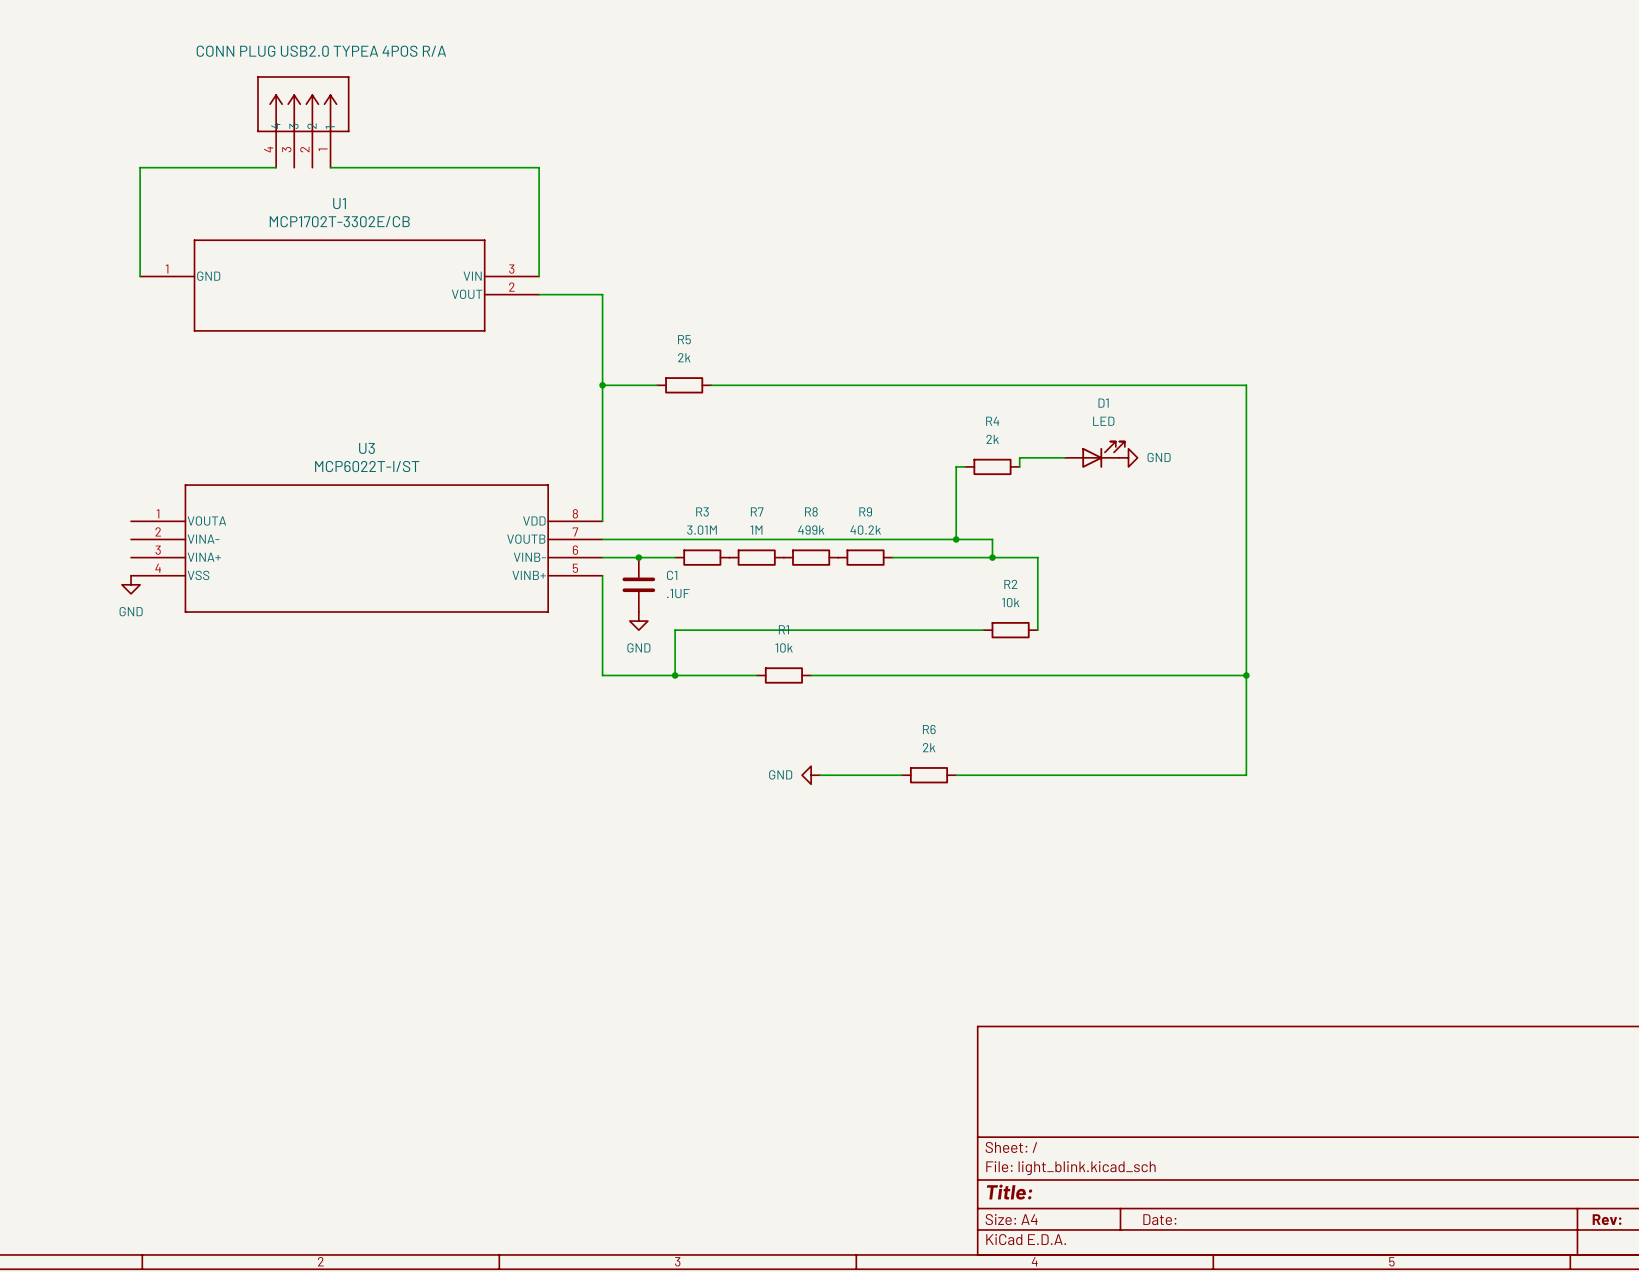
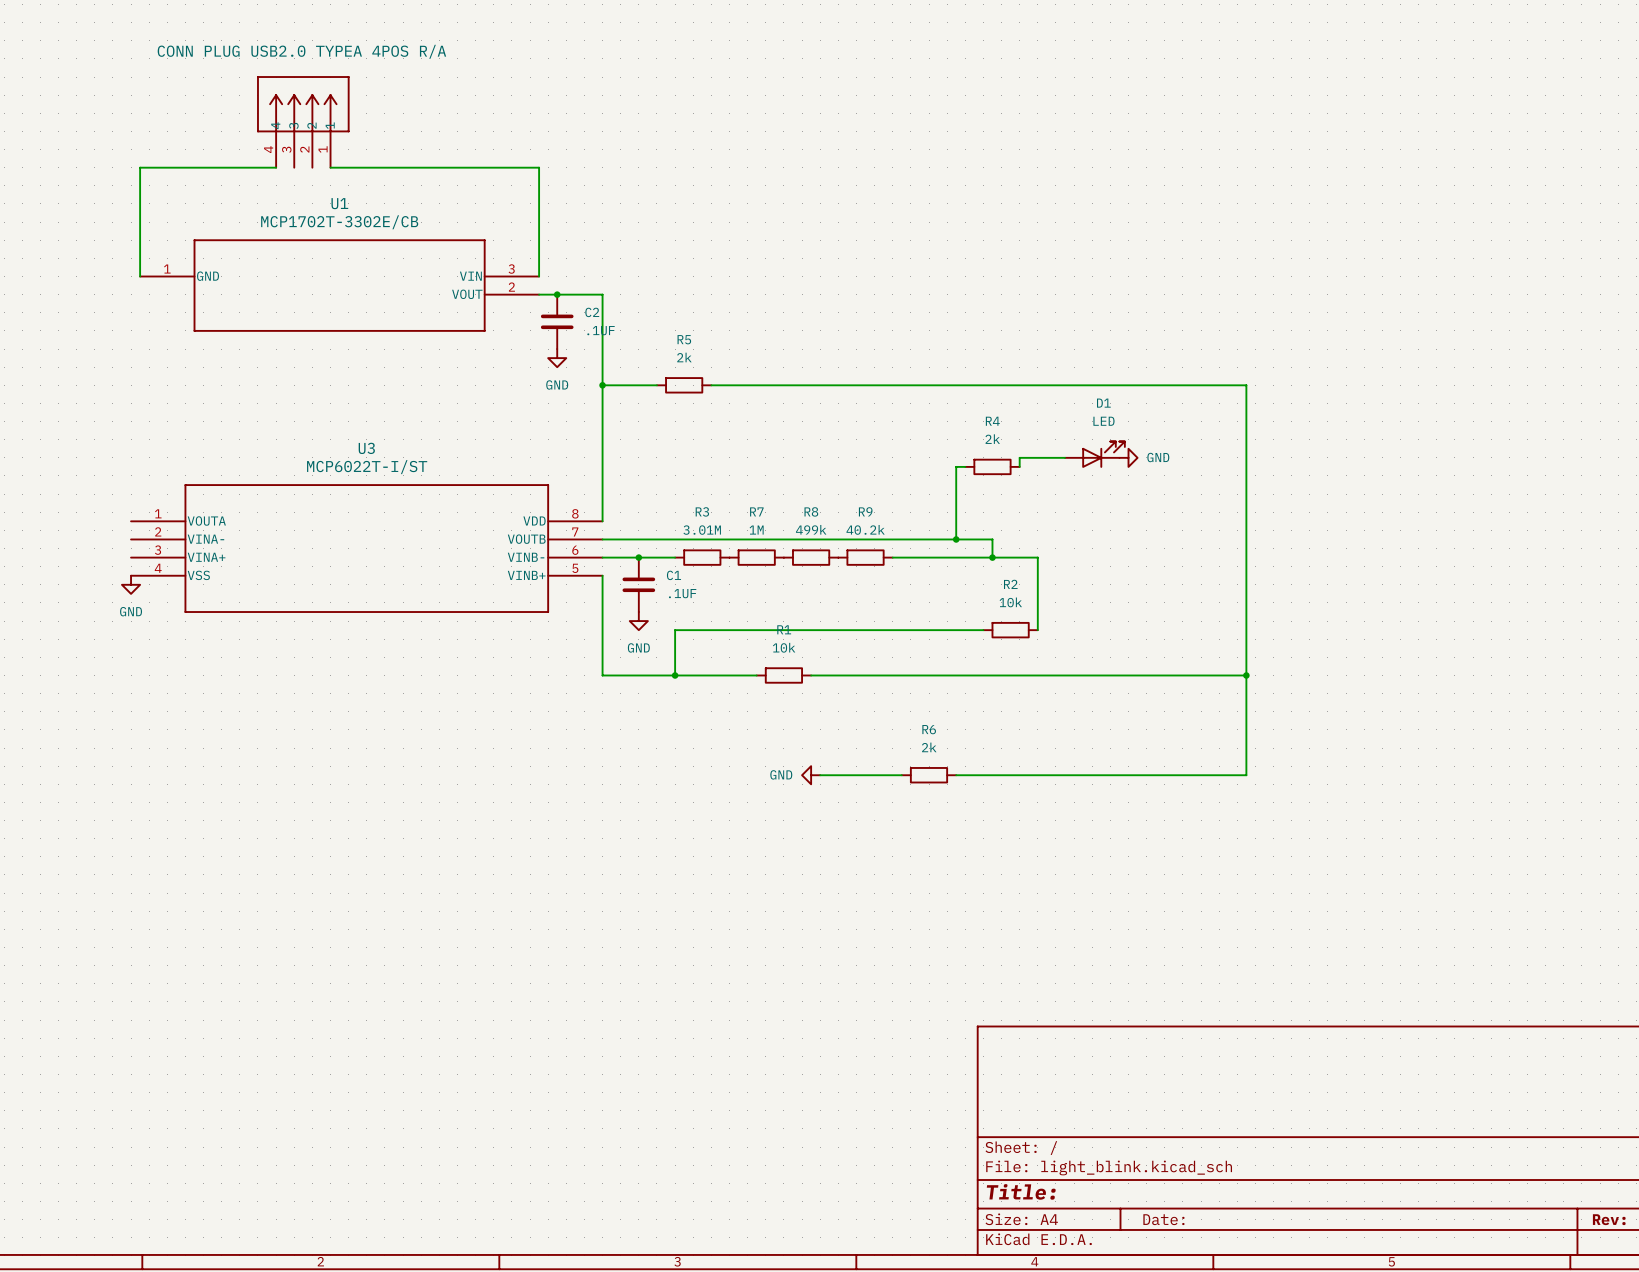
junction: none -> (557, 294)
C2: none -> .1UF (557, 321)
power symbol: none -> GND (557, 358)

